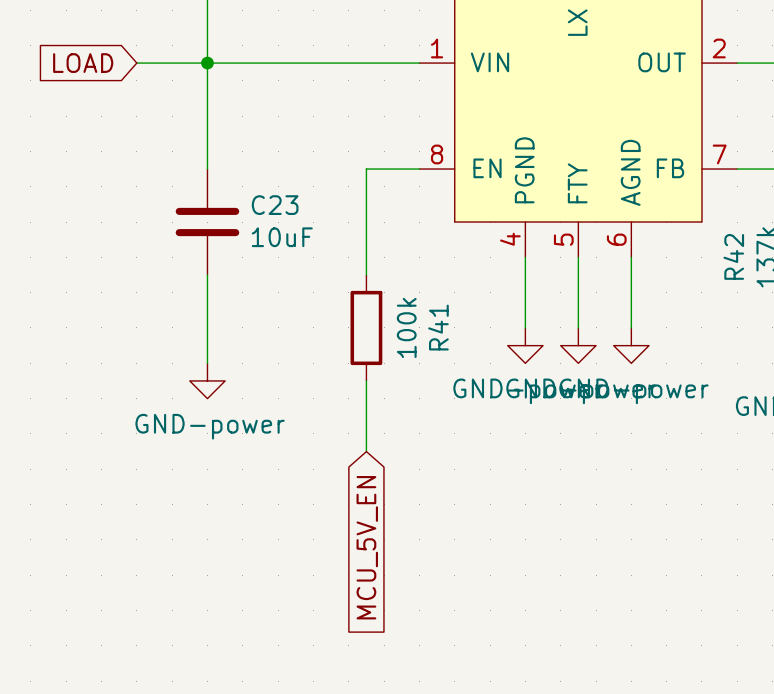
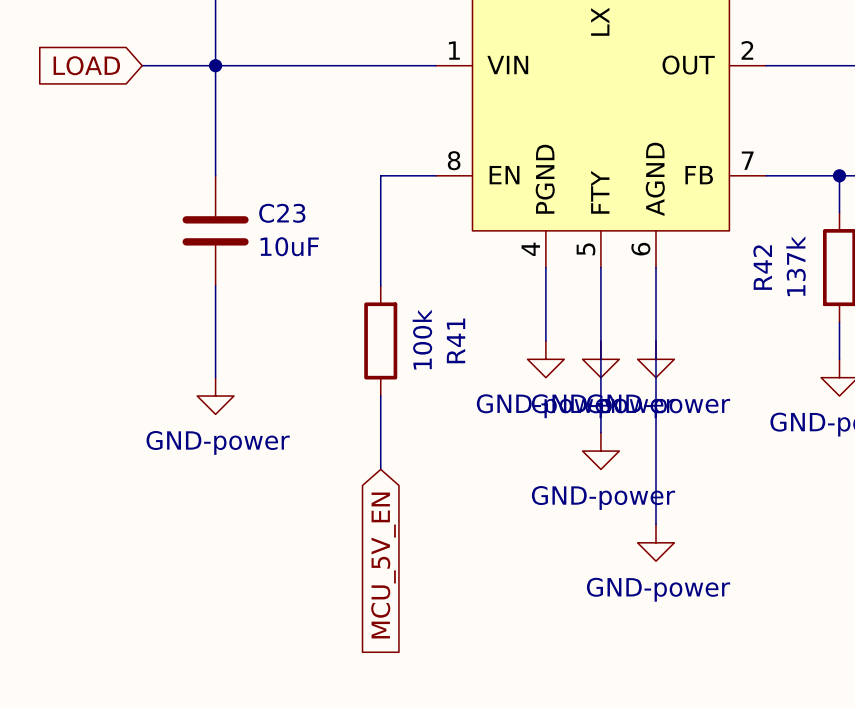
wire: none -> (600, 340) (600, 432)
wire: none -> (655, 340) (655, 524)
power symbol: none -> GND-power (600, 451)
power symbol: none -> GND-power (655, 542)

